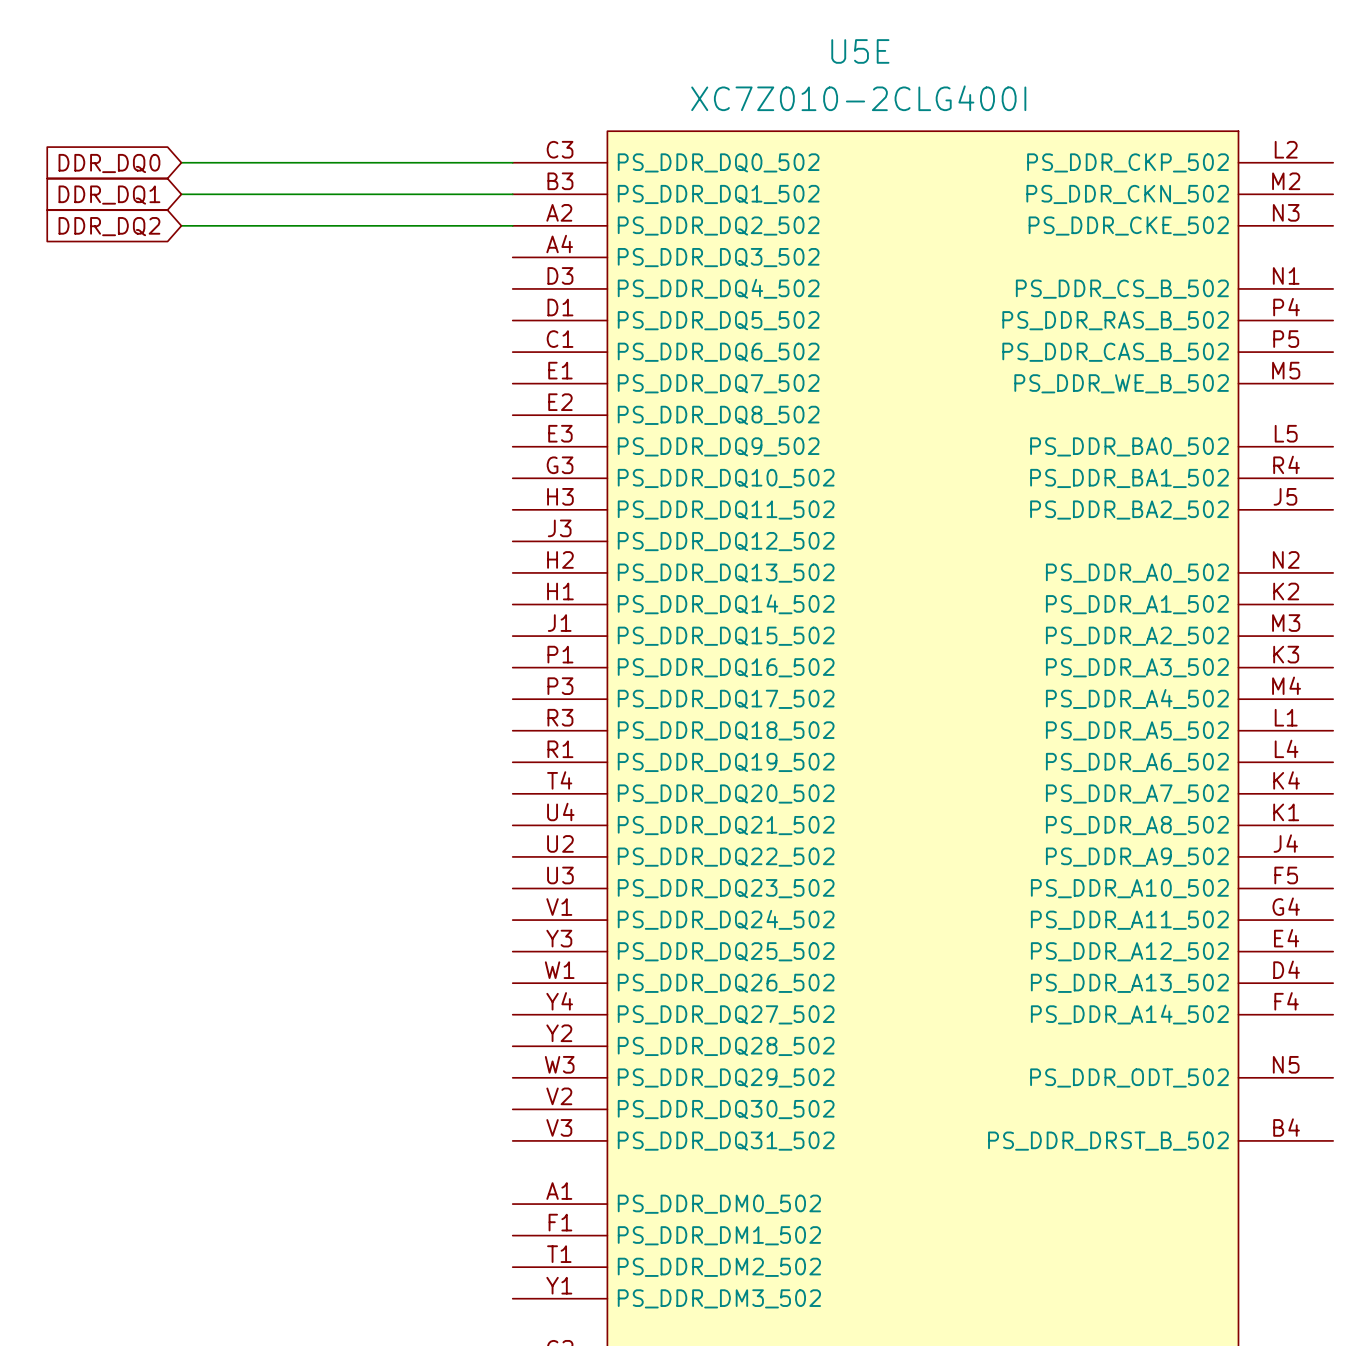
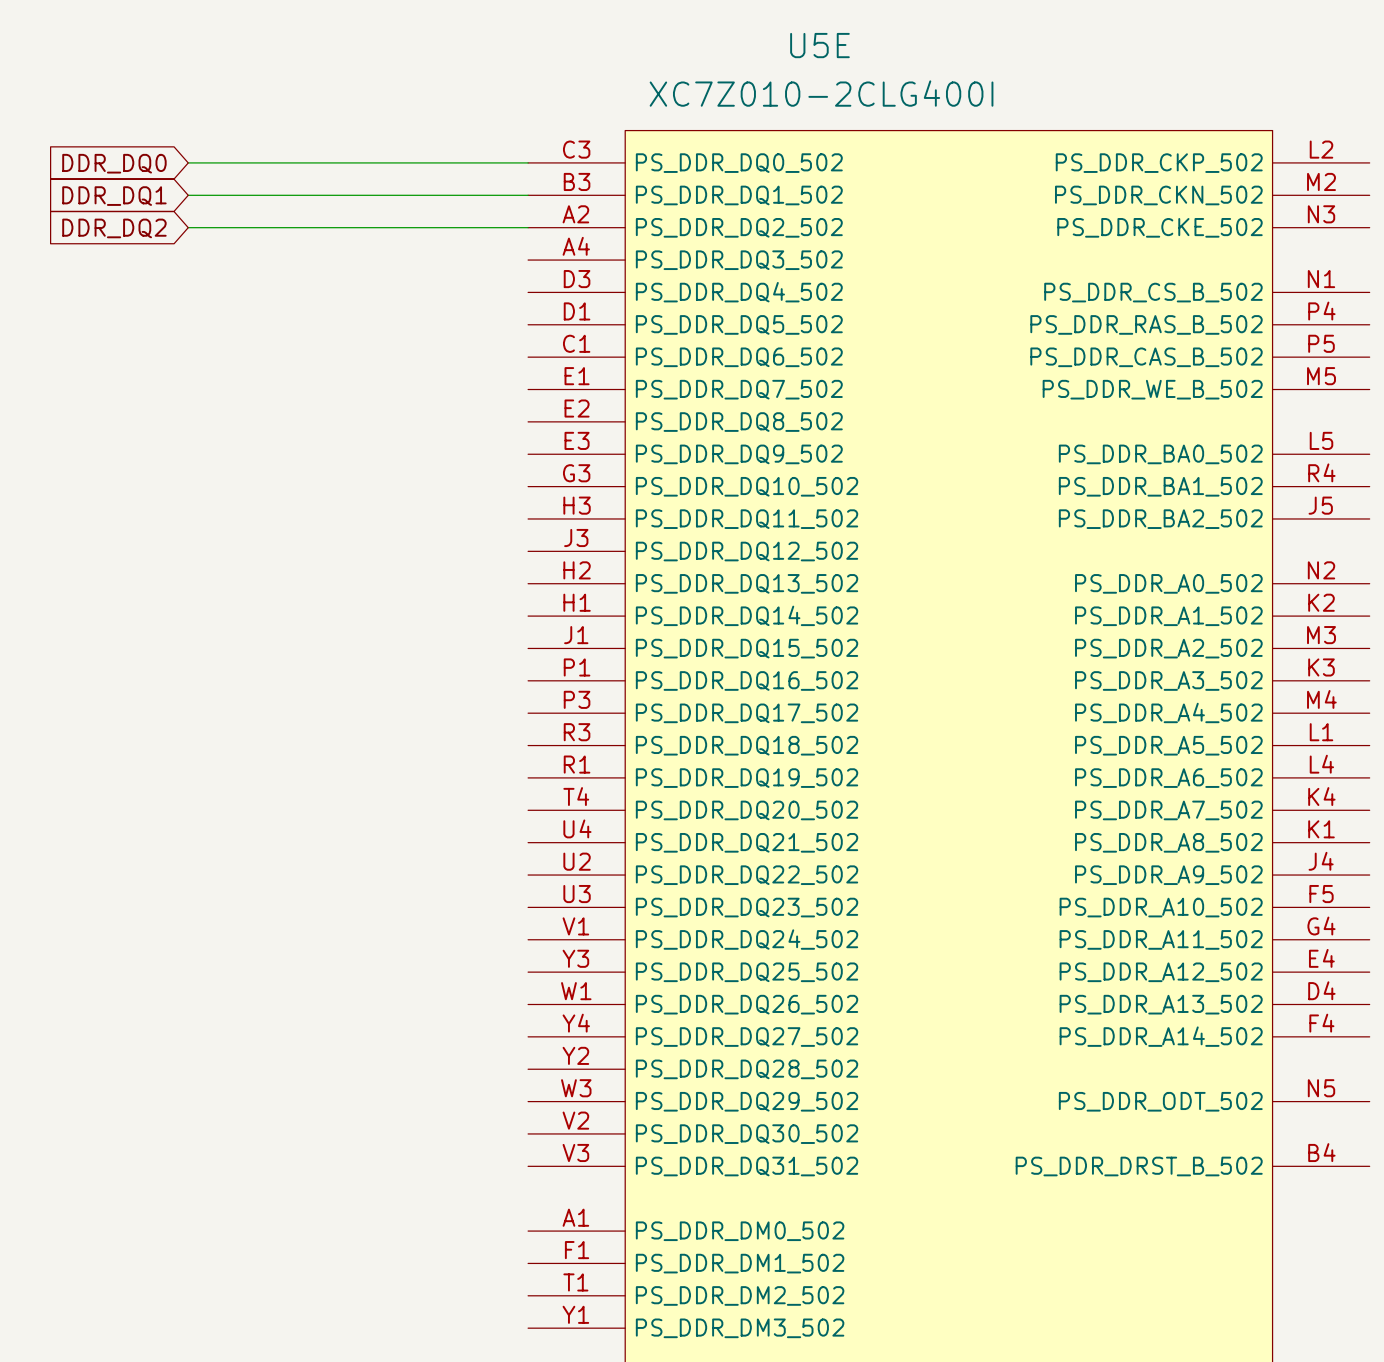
U5E name position: U5E (860, 51) -> U5E (819, 45)
U5E value position: XC7Z010-2CLG400I (858, 98) -> XC7Z010-2CLG400I (821, 93)

